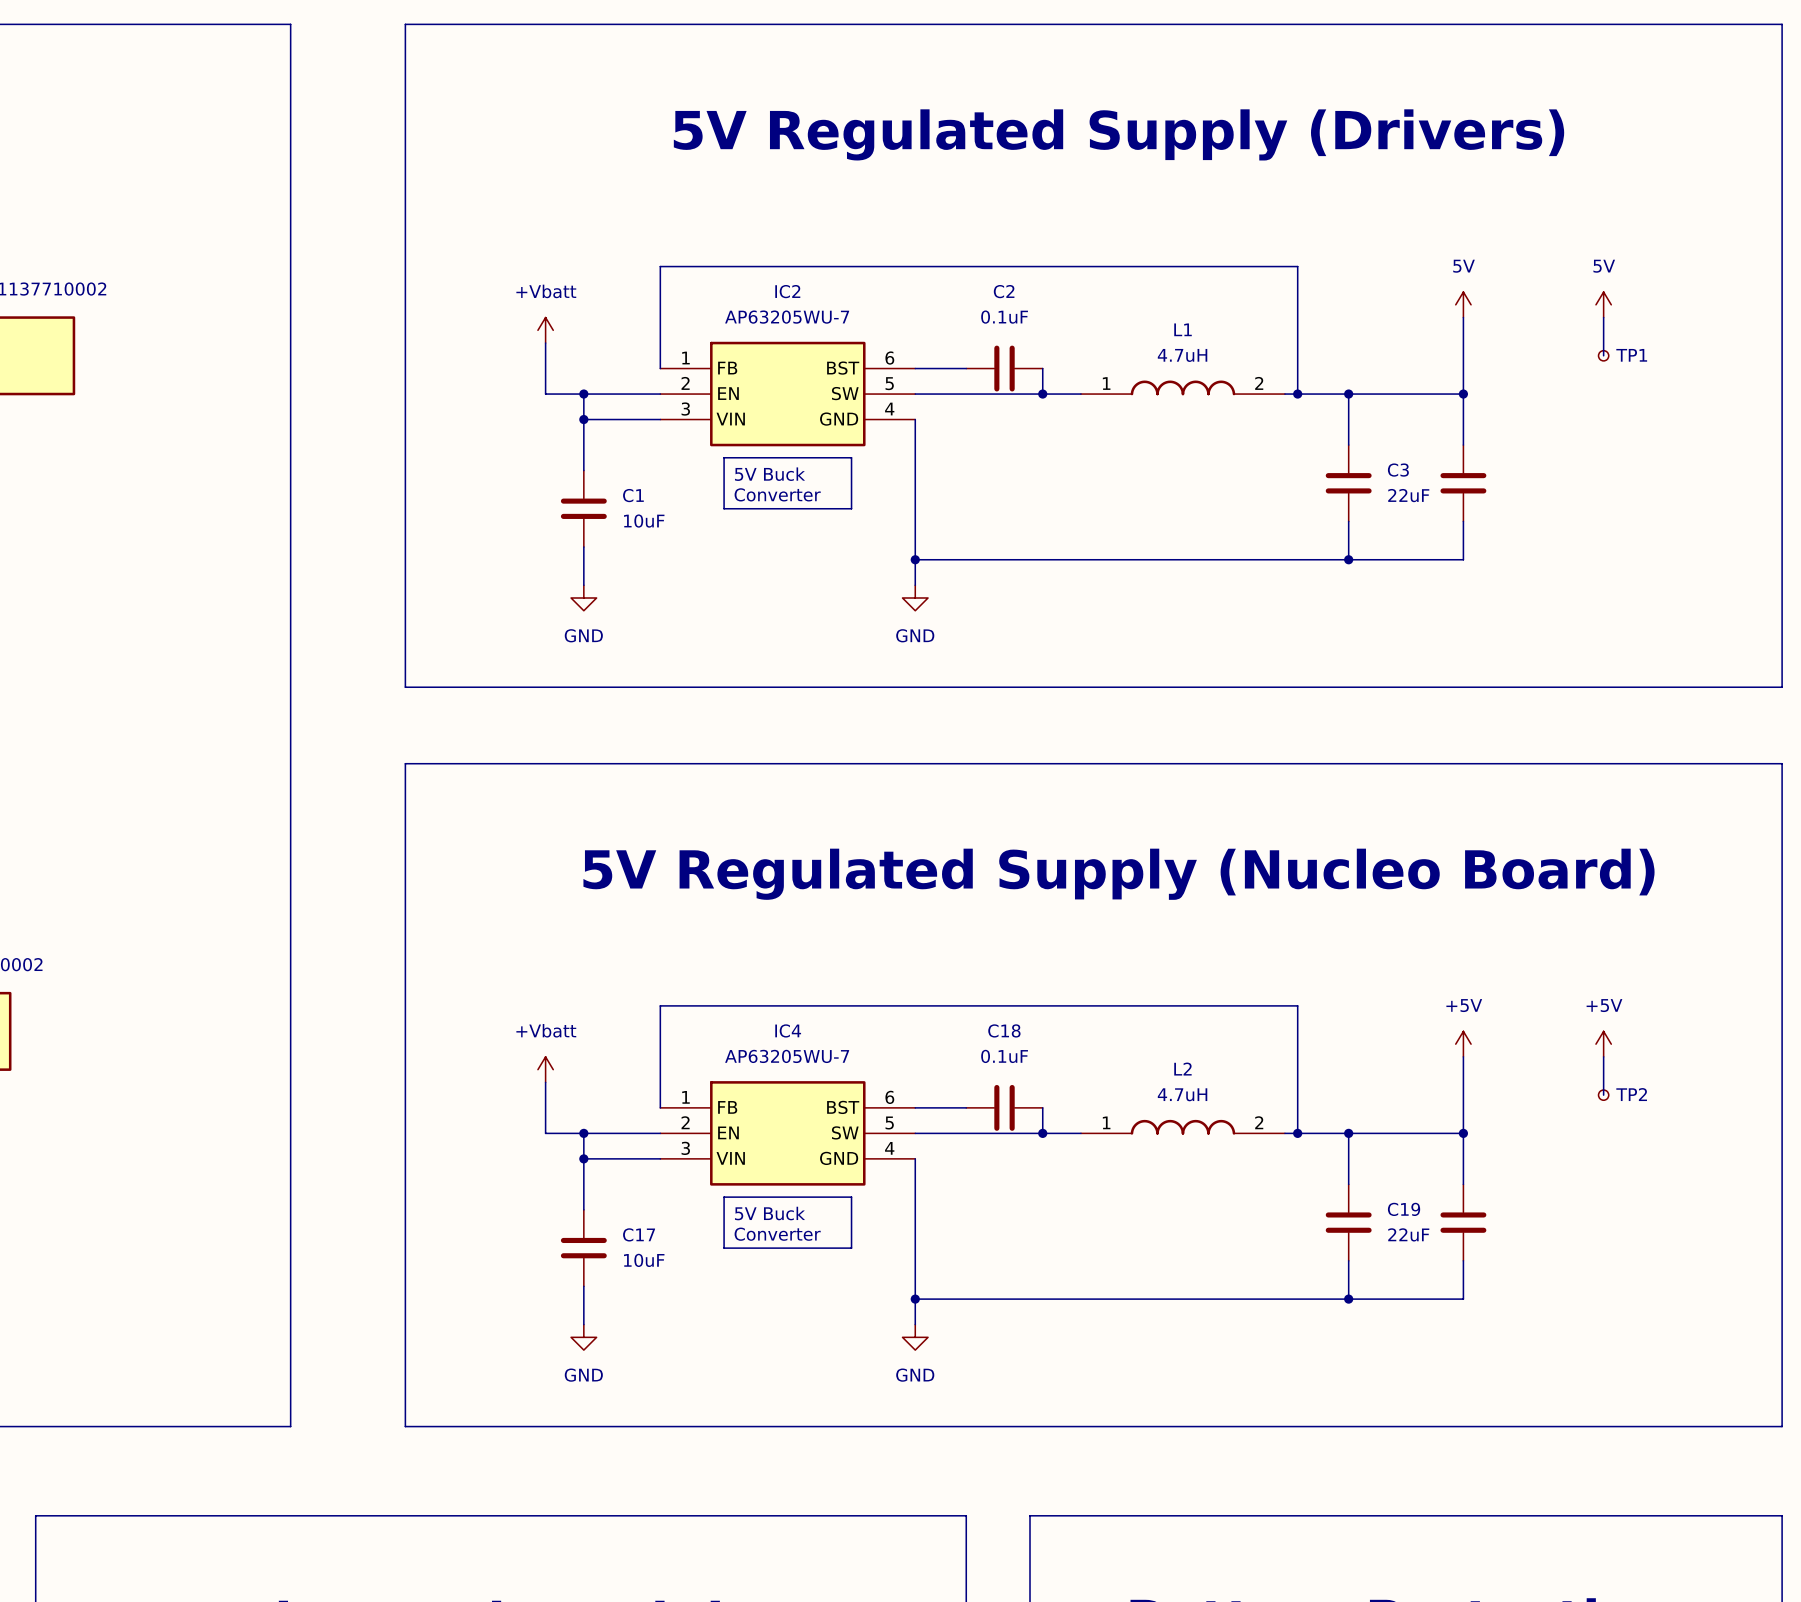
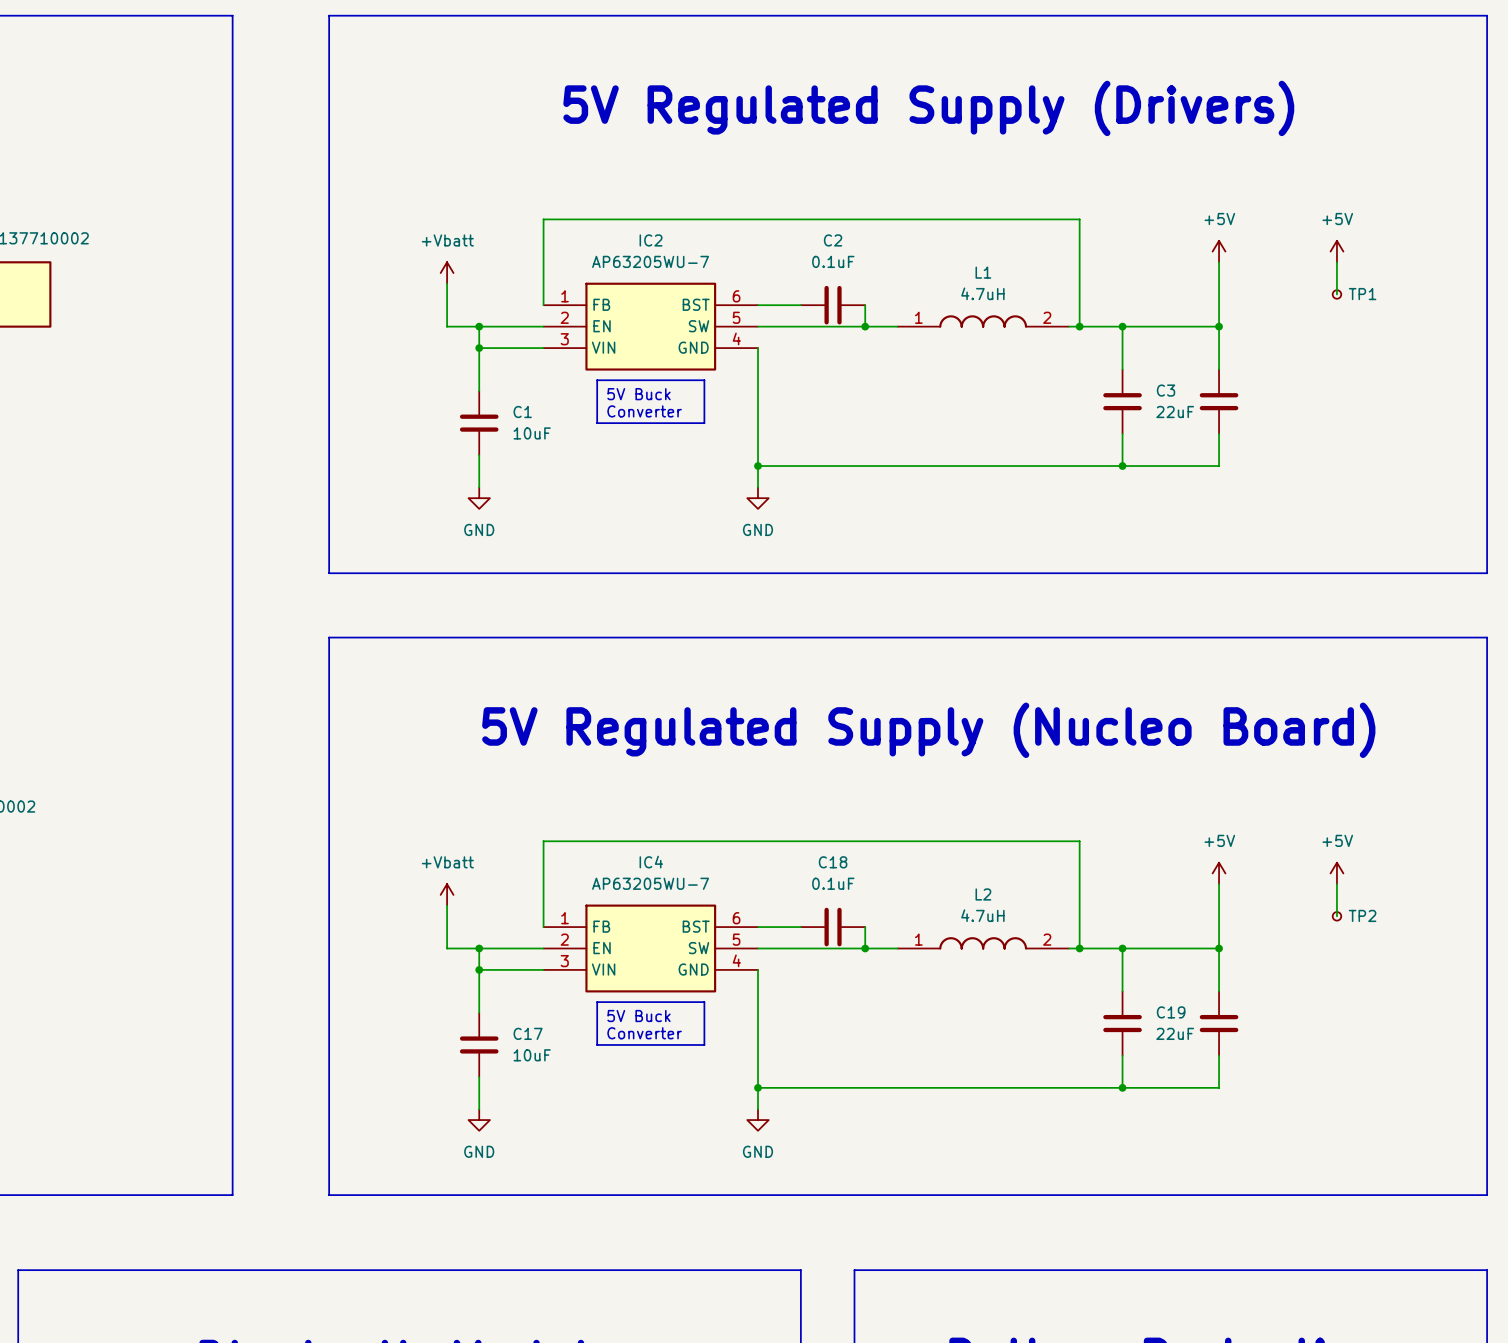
power symbol: 5V (1463, 304) -> +5V (1219, 251)
power symbol: 5V (1603, 304) -> +5V (1336, 251)

